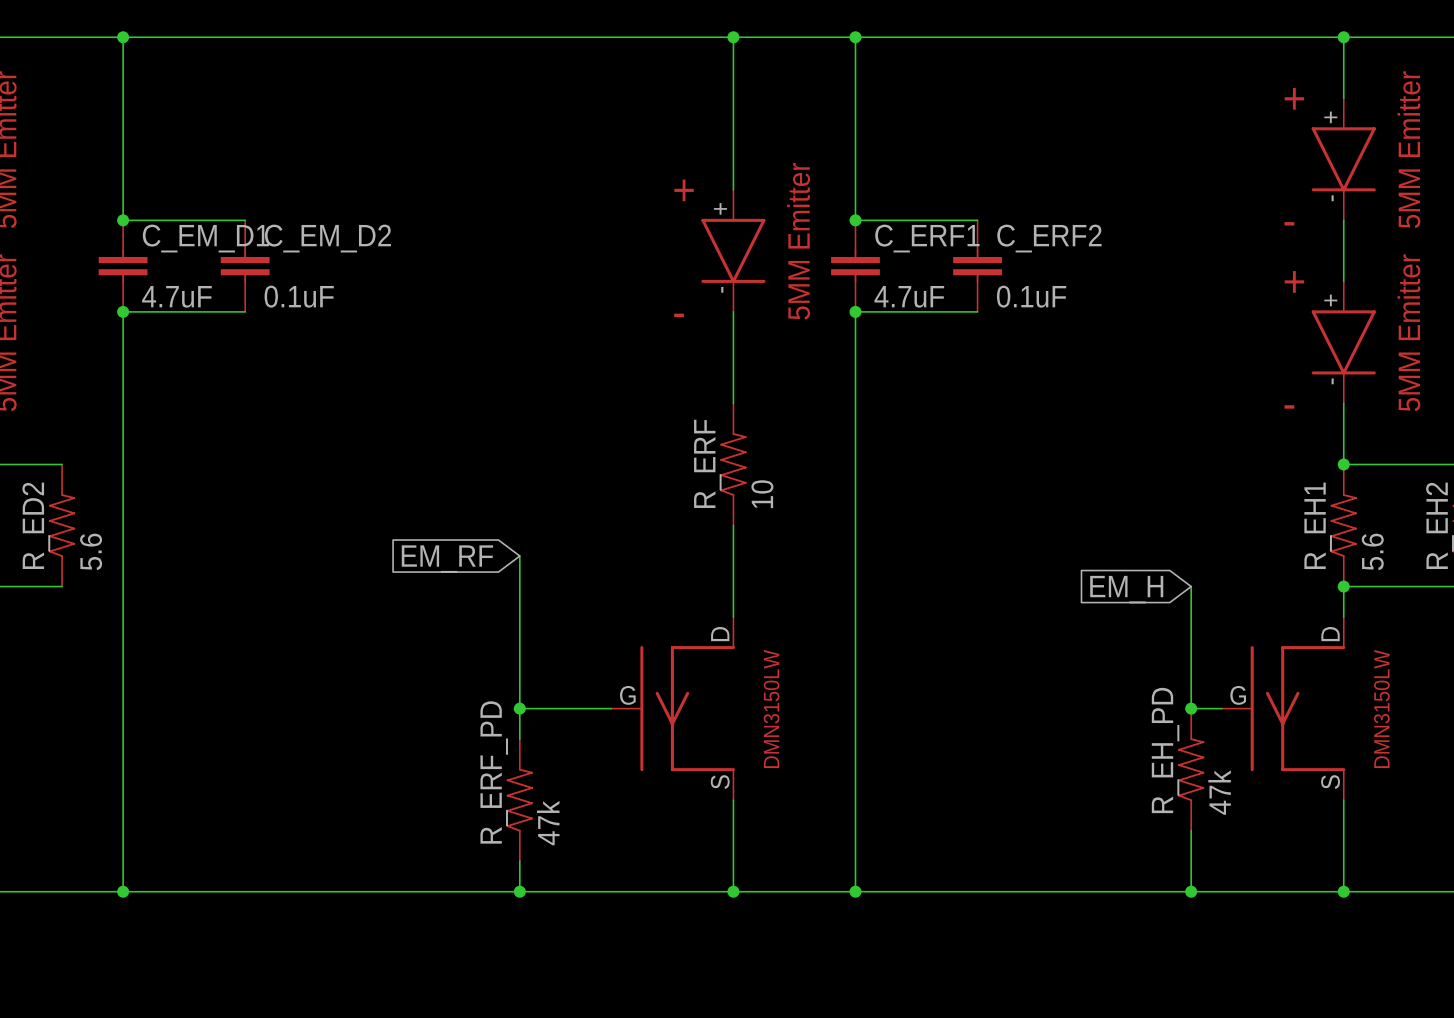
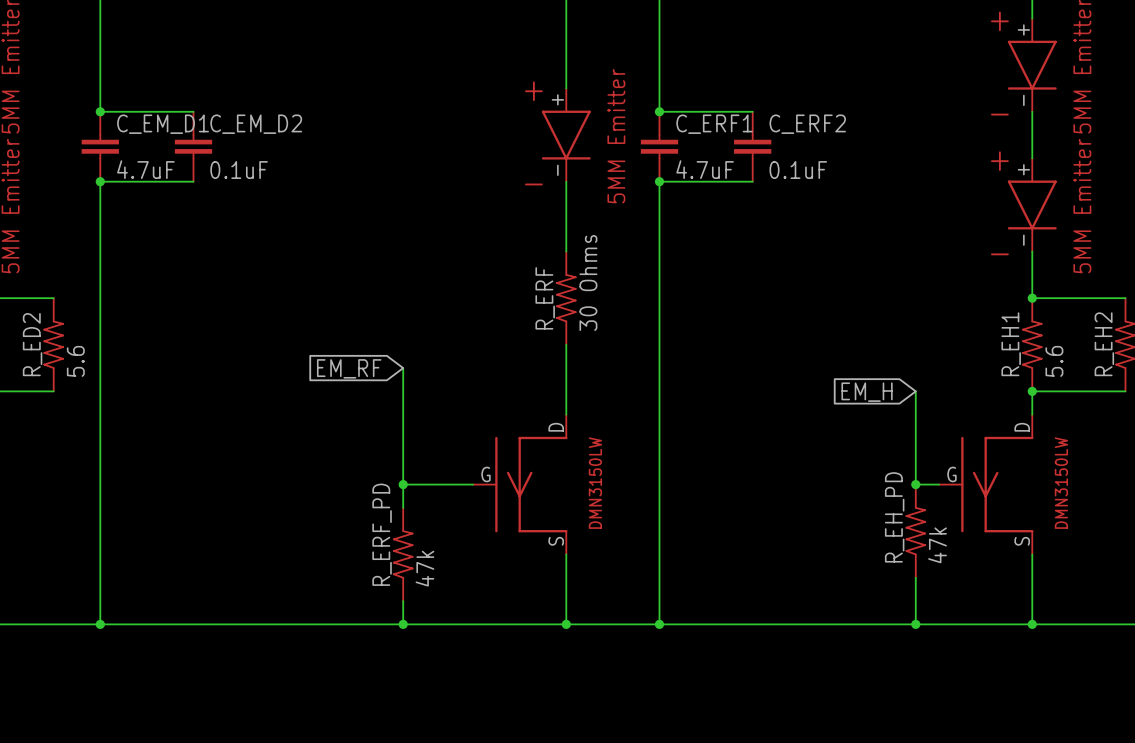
R_ERF value: 10 (762, 494) -> 30 Ohms (588, 282)

